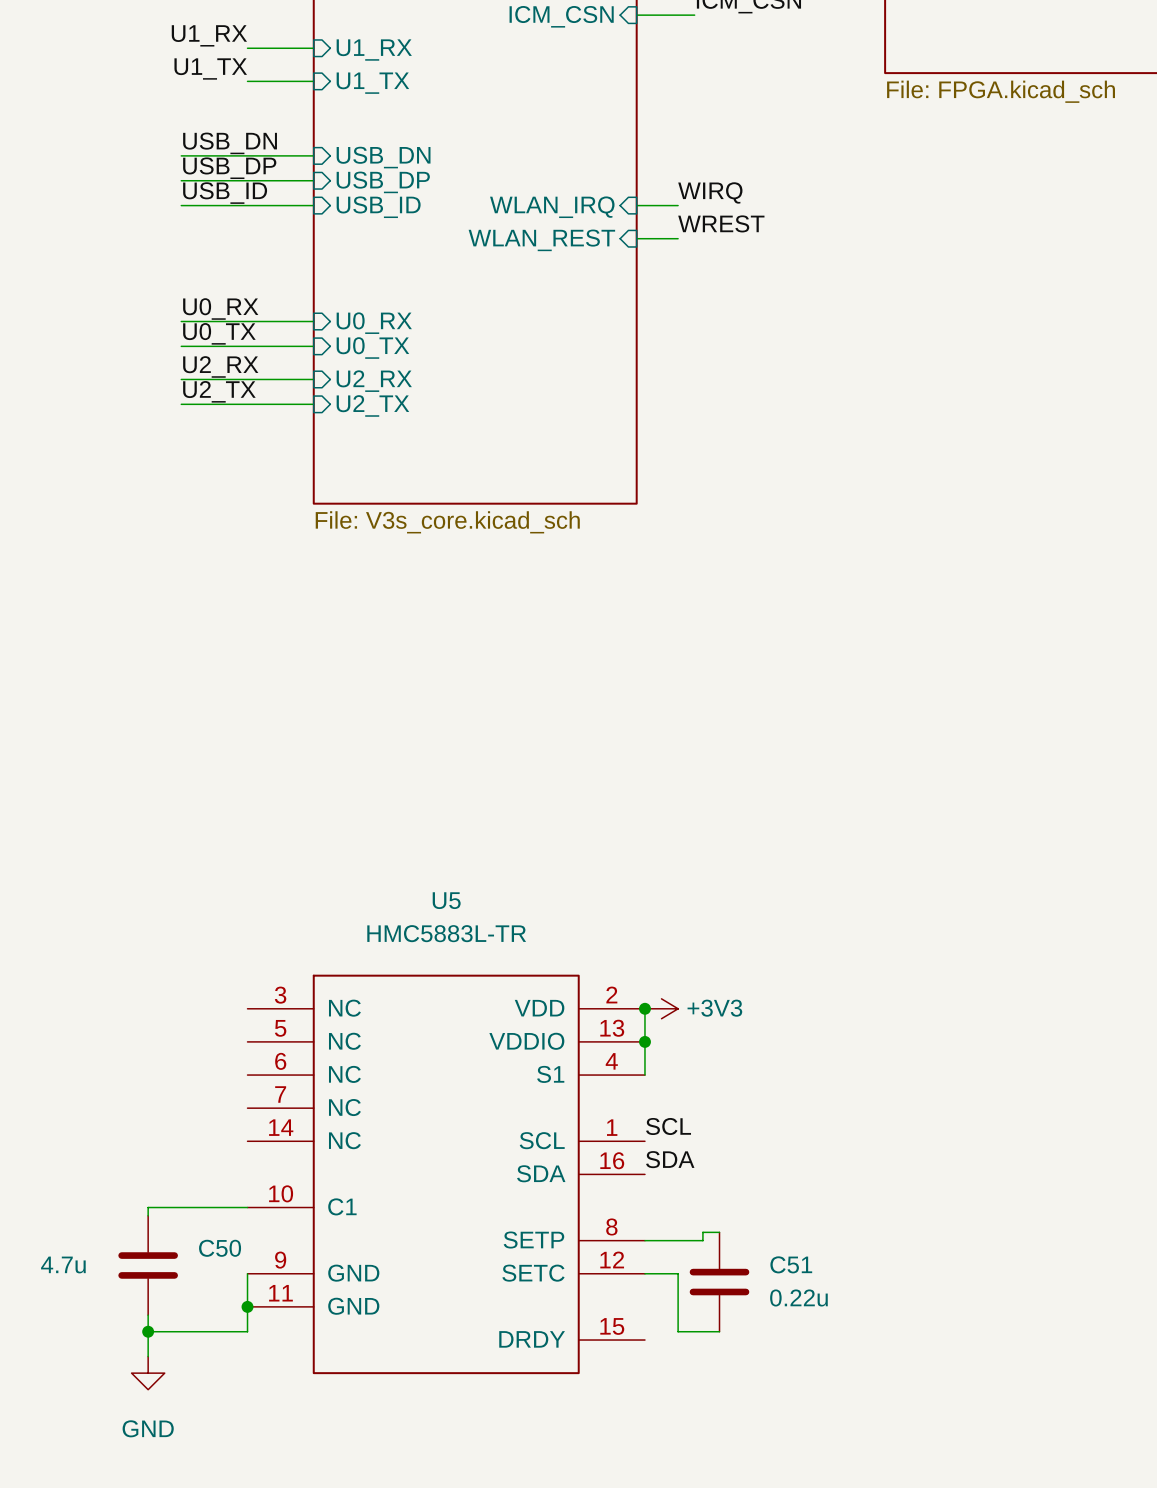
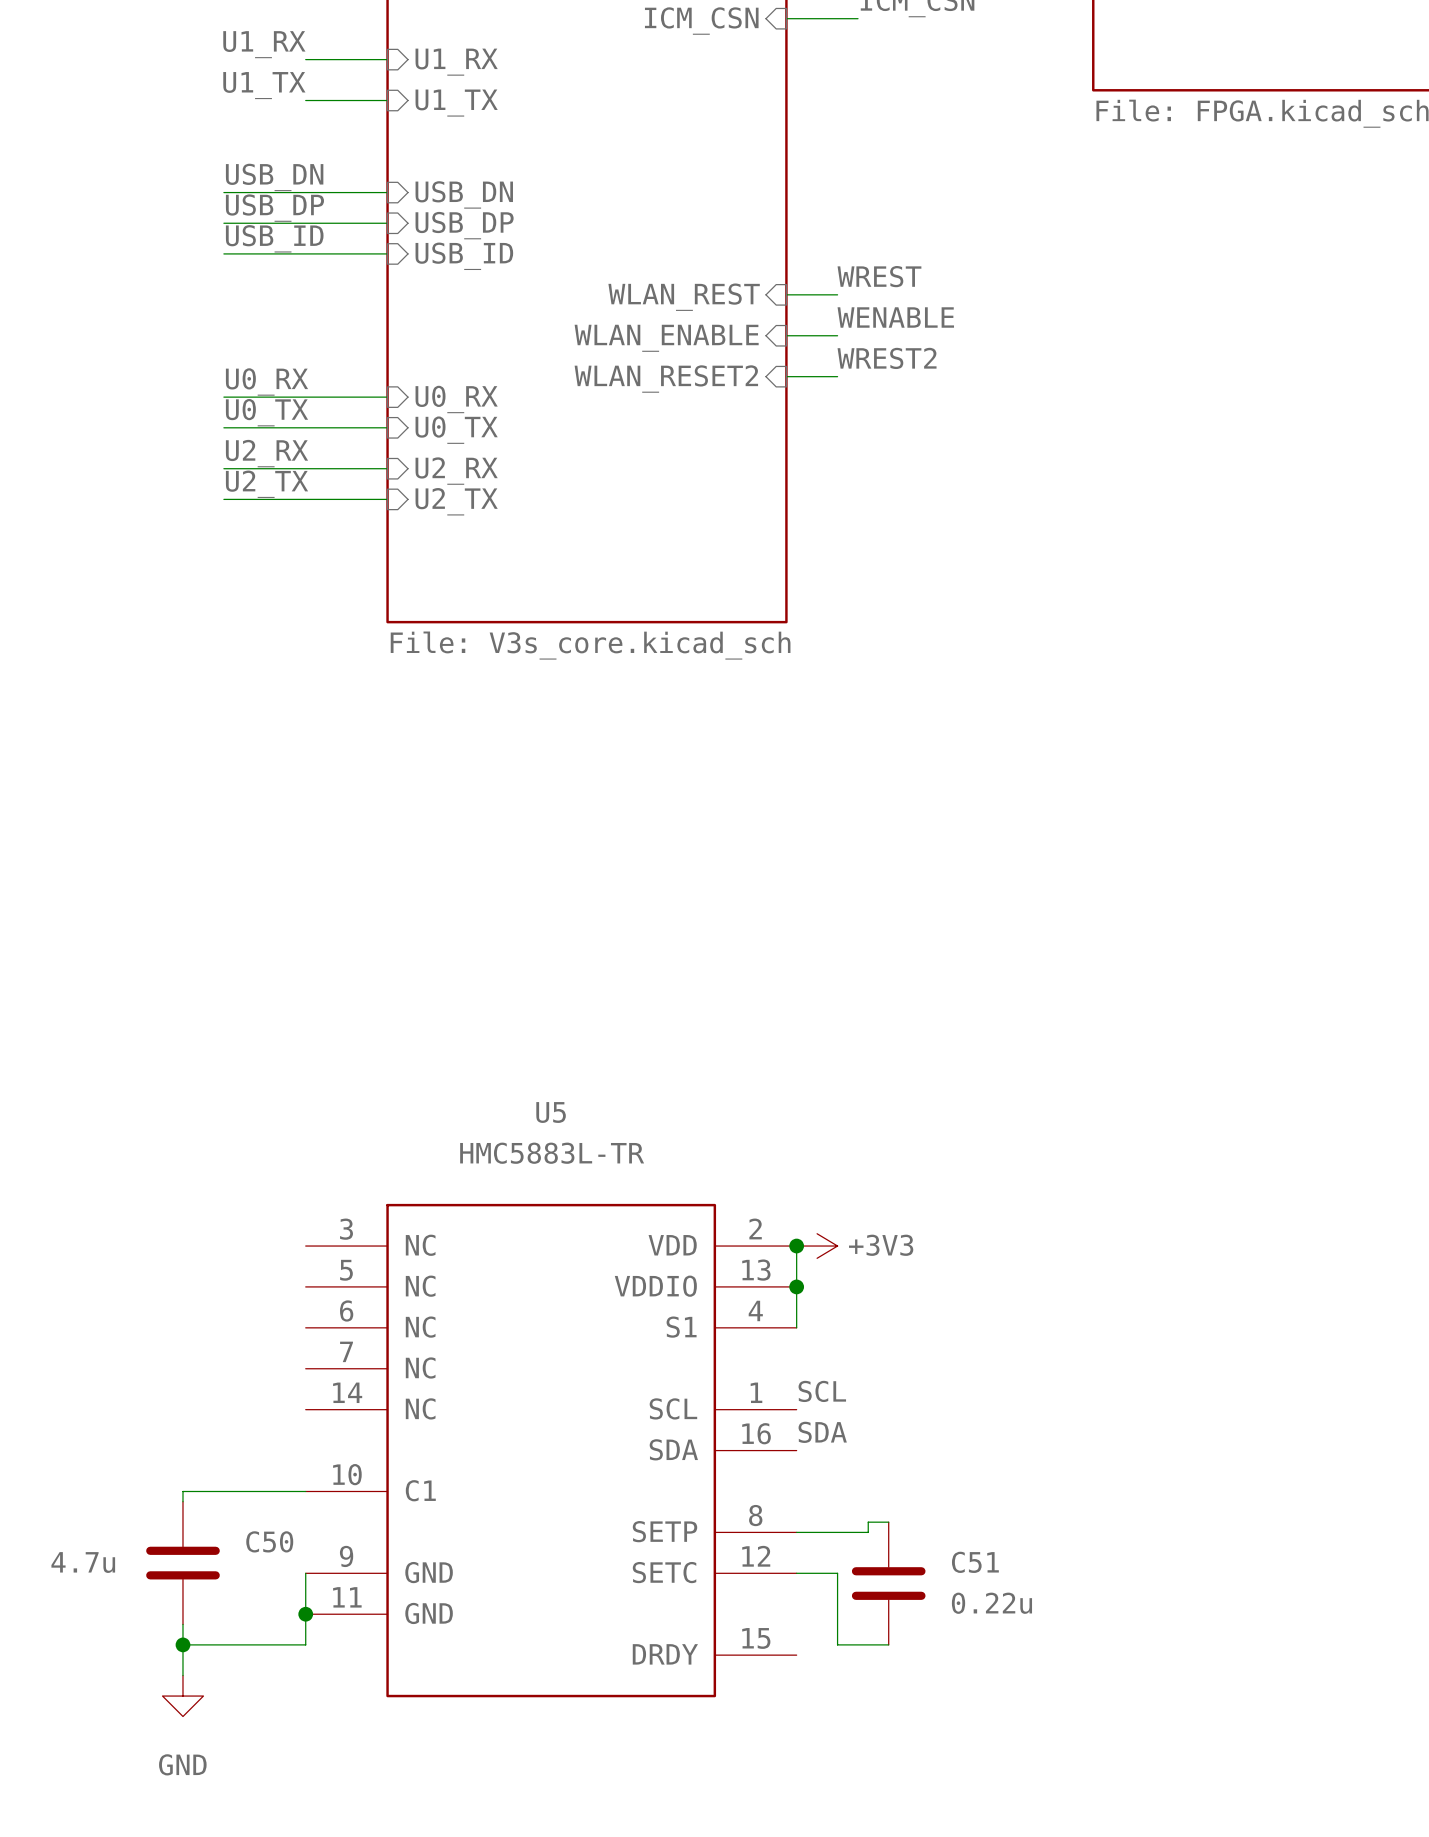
label: WIRQ (710, 192) -> none
wire: (636, 205) (678, 205) -> (786, 335) (837, 335)
sheet pin: WLAN_IRQ (552, 207) -> none
label: none -> WENABLE (895, 317)
sheet pin: none -> WLAN_ENABLE (666, 338)
label: none -> WREST2 (887, 358)
wire: none -> (786, 376) (837, 376)
sheet pin: none -> WLAN_RESET2 (666, 379)

